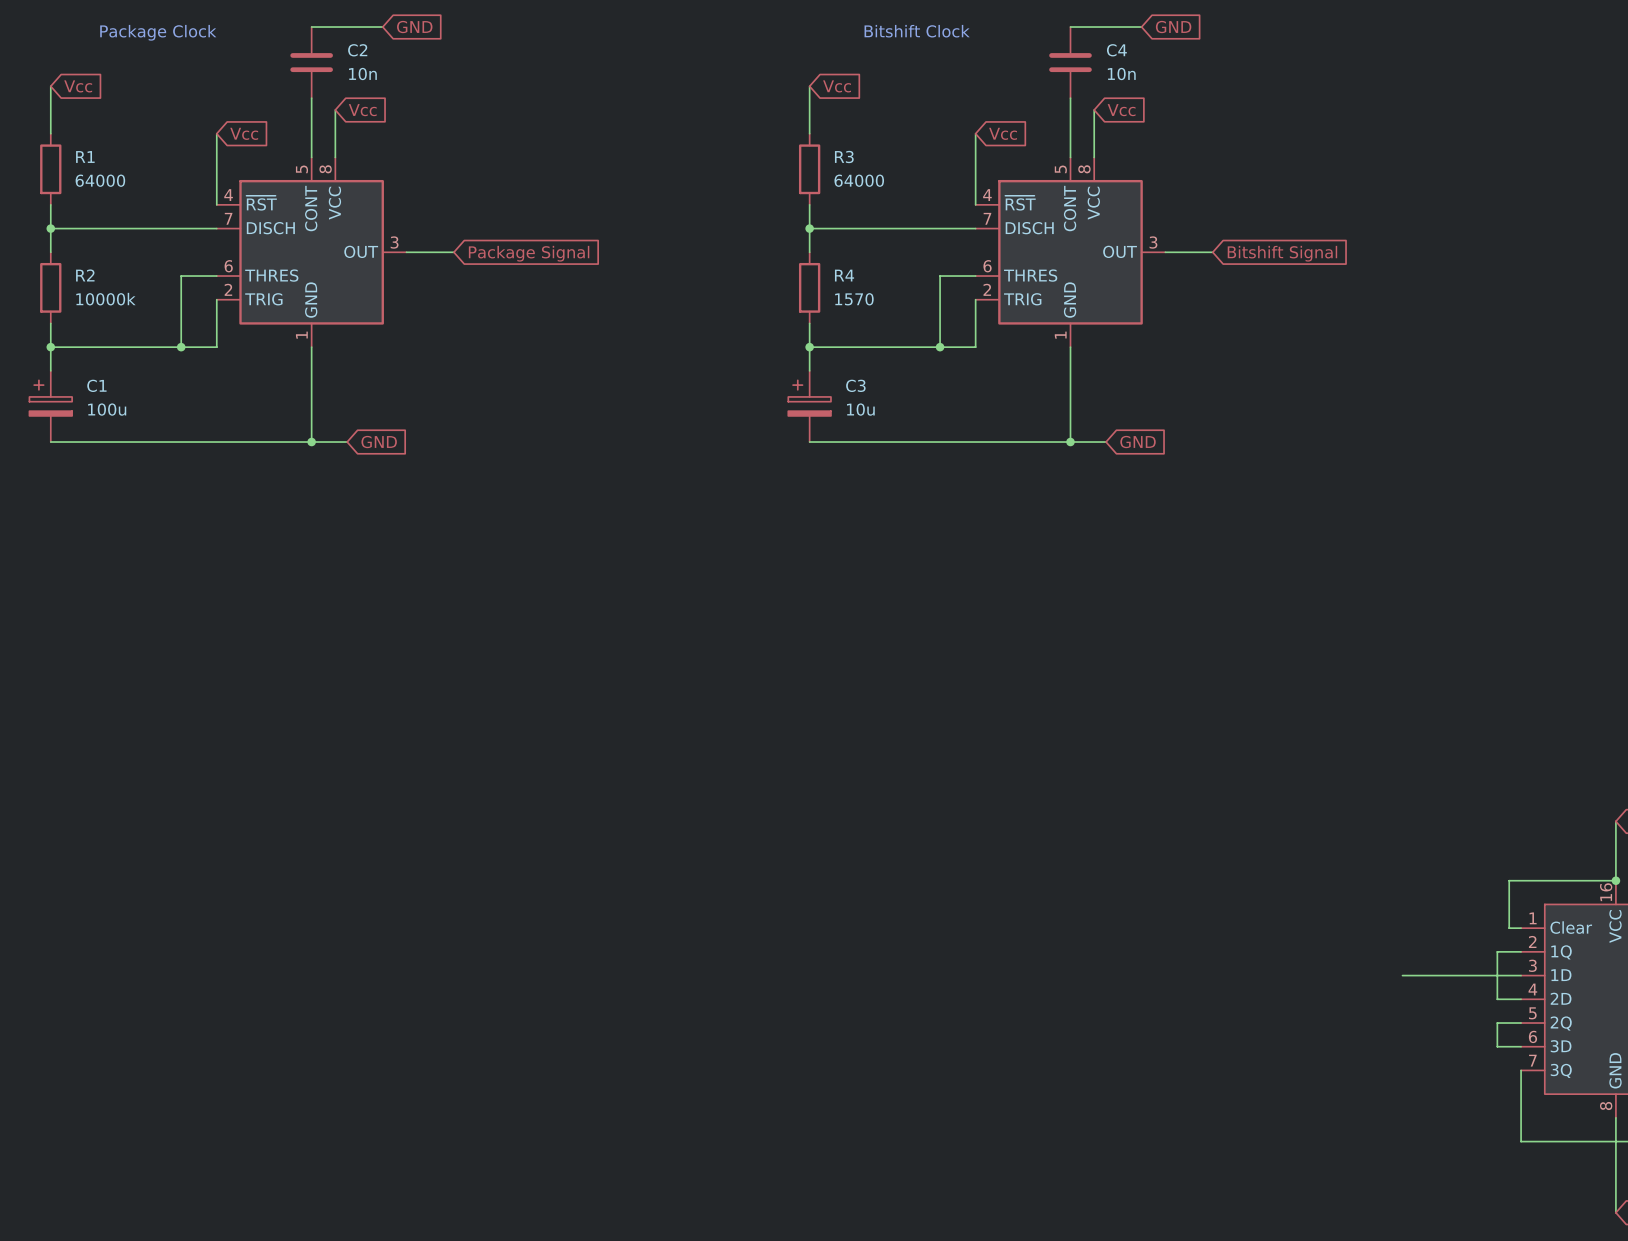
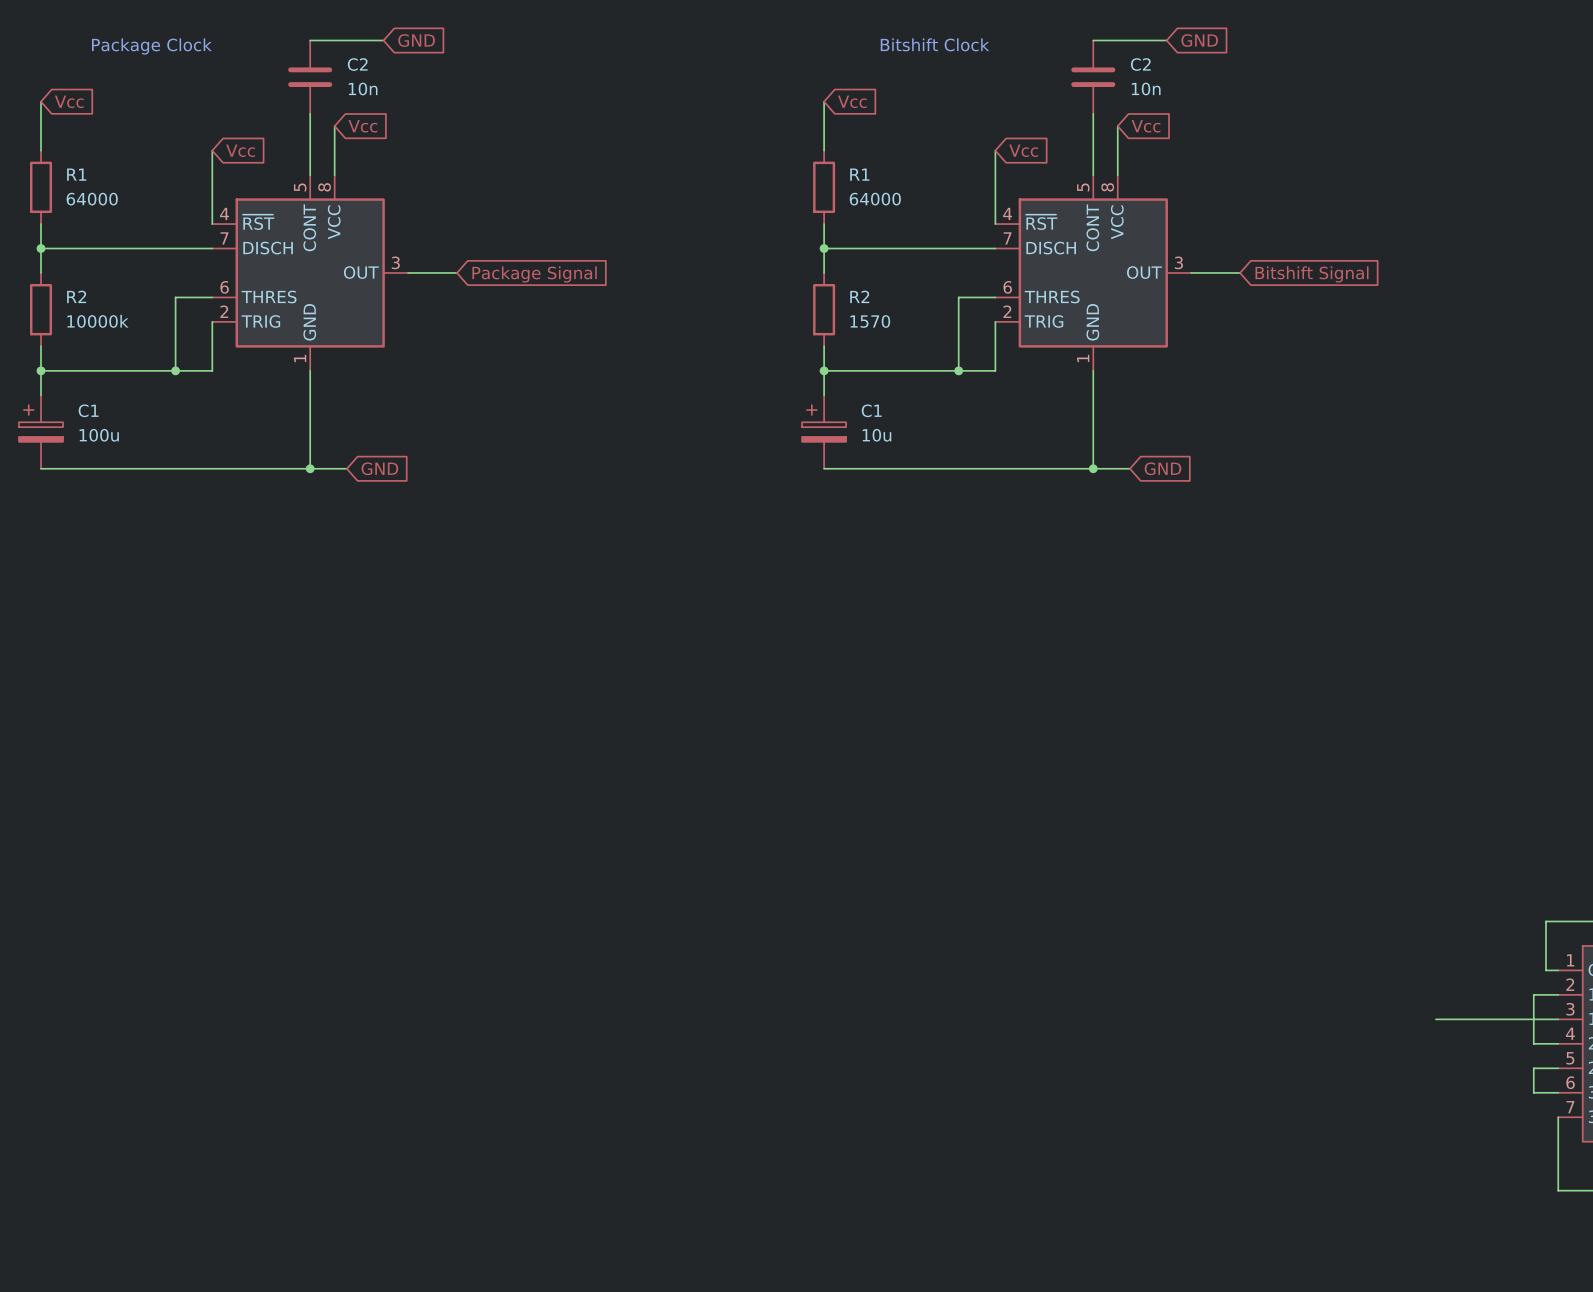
C4 name: C4 (1116, 50) -> C2 (1140, 64)
R3 name: R3 (844, 157) -> R1 (859, 174)
R4 name: R4 (844, 275) -> R2 (859, 296)
C3 name: C3 (855, 385) -> C1 (871, 410)

